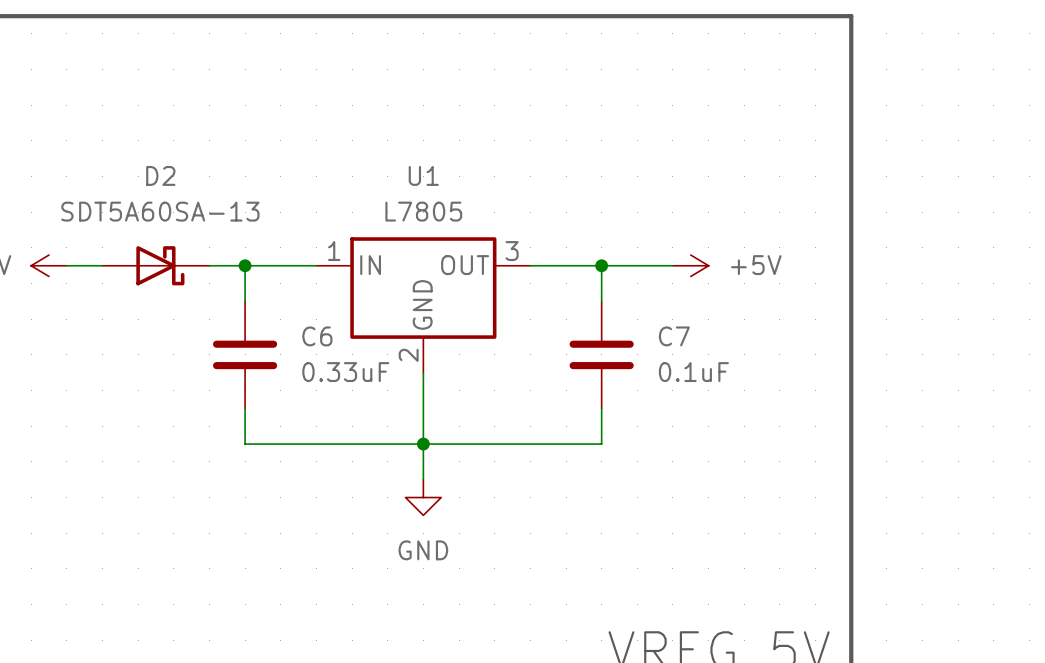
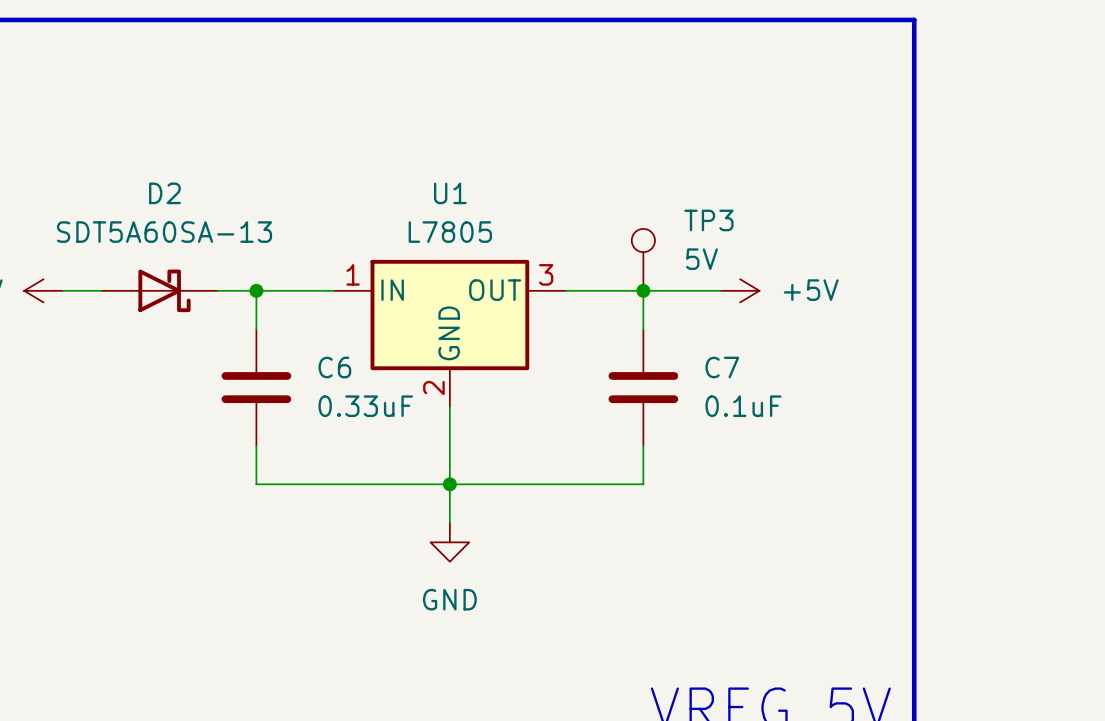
TP3: none -> 5V (643, 259)

